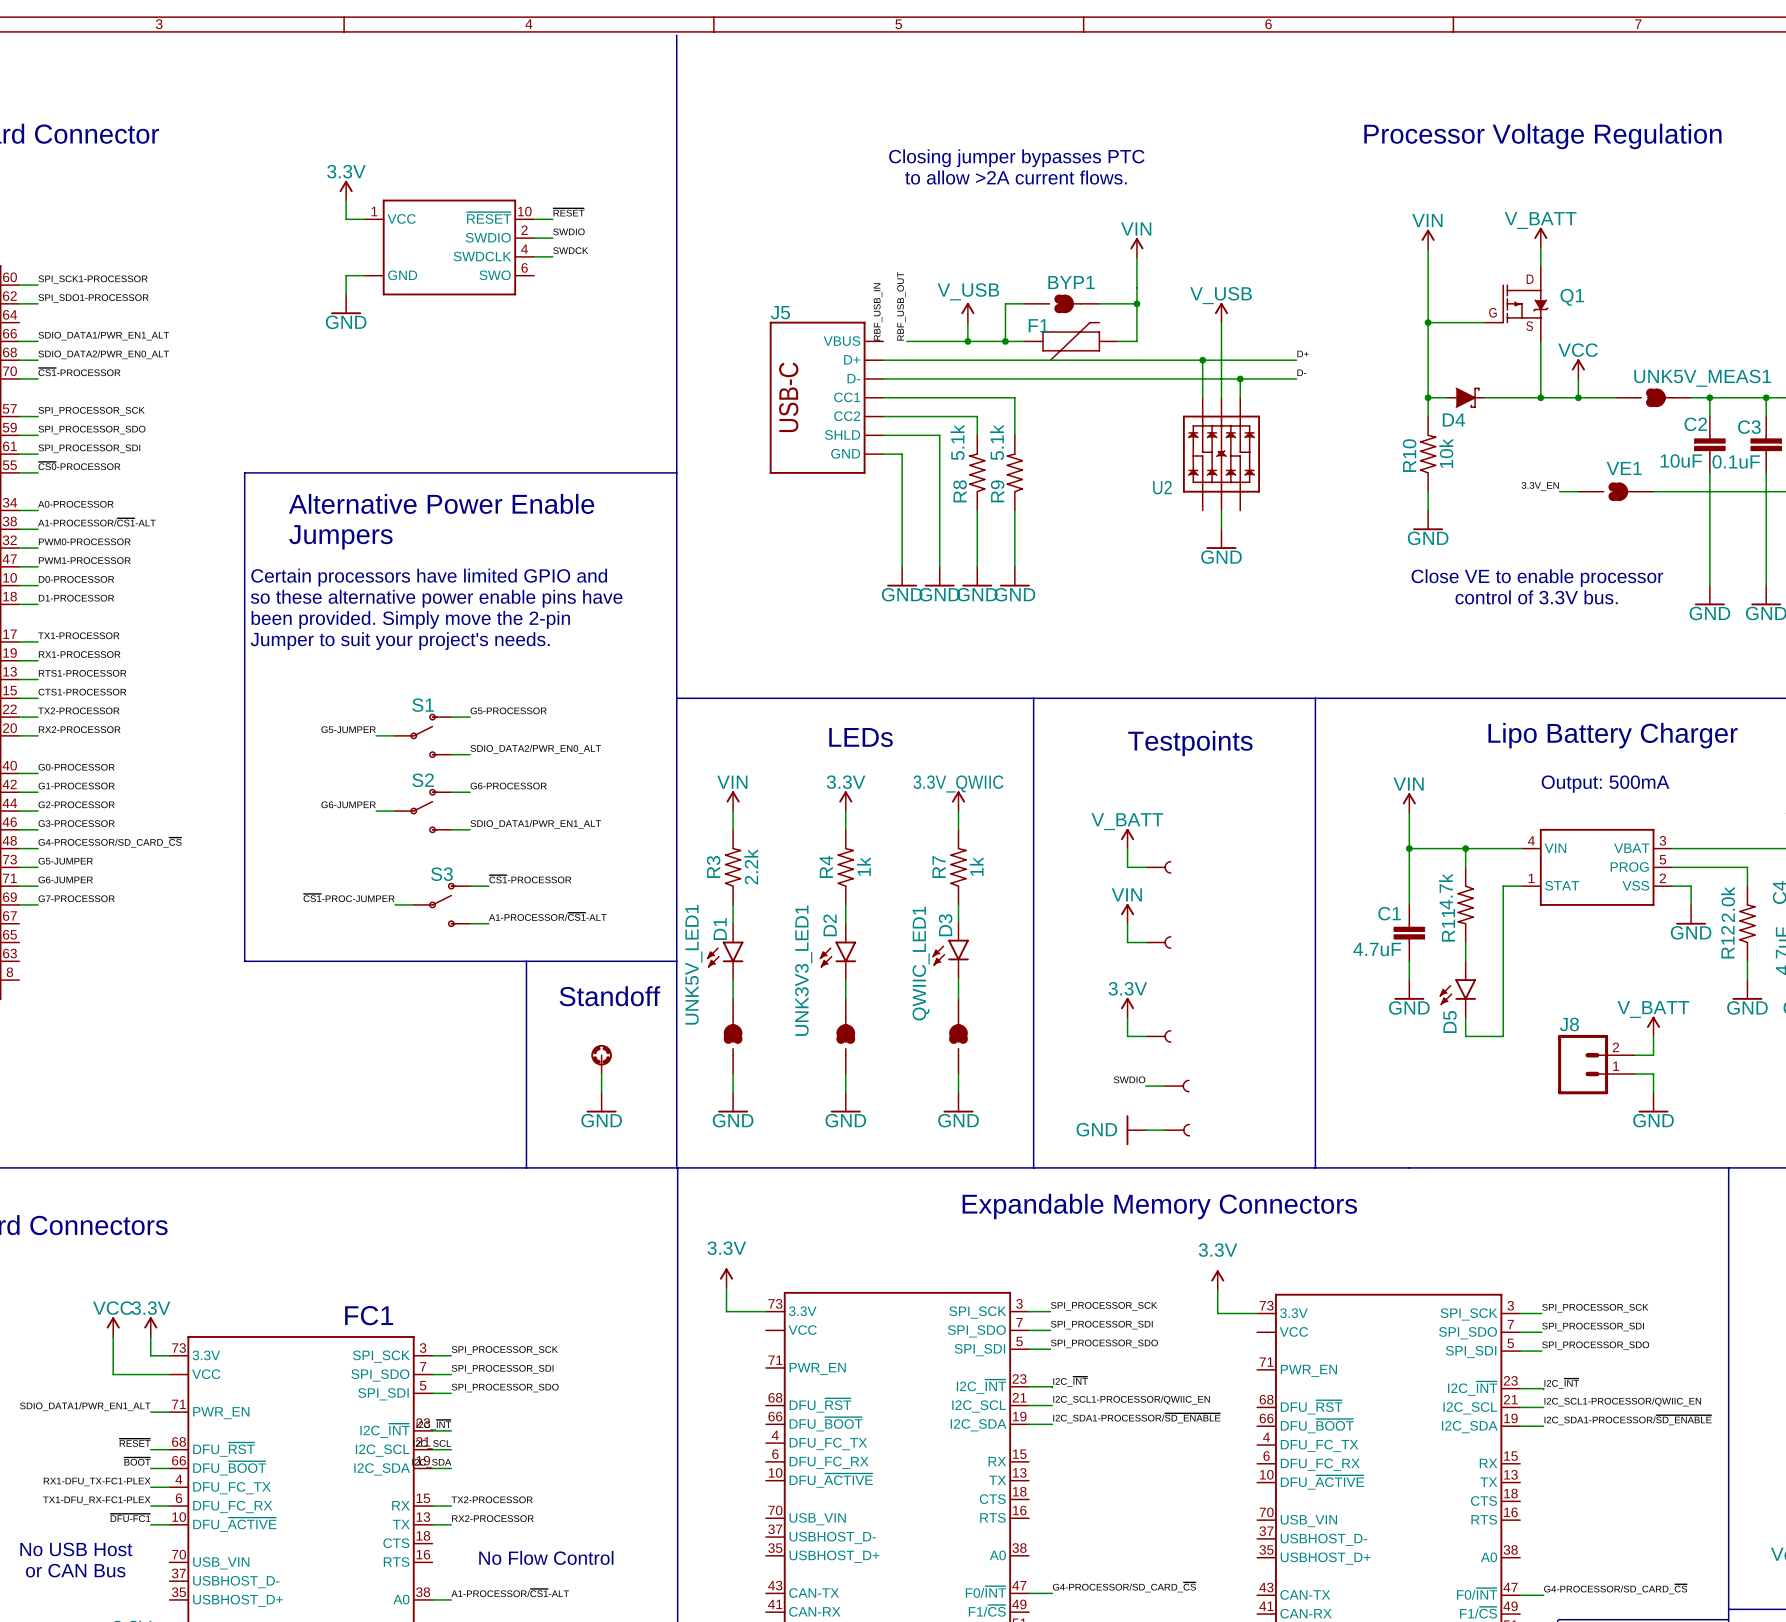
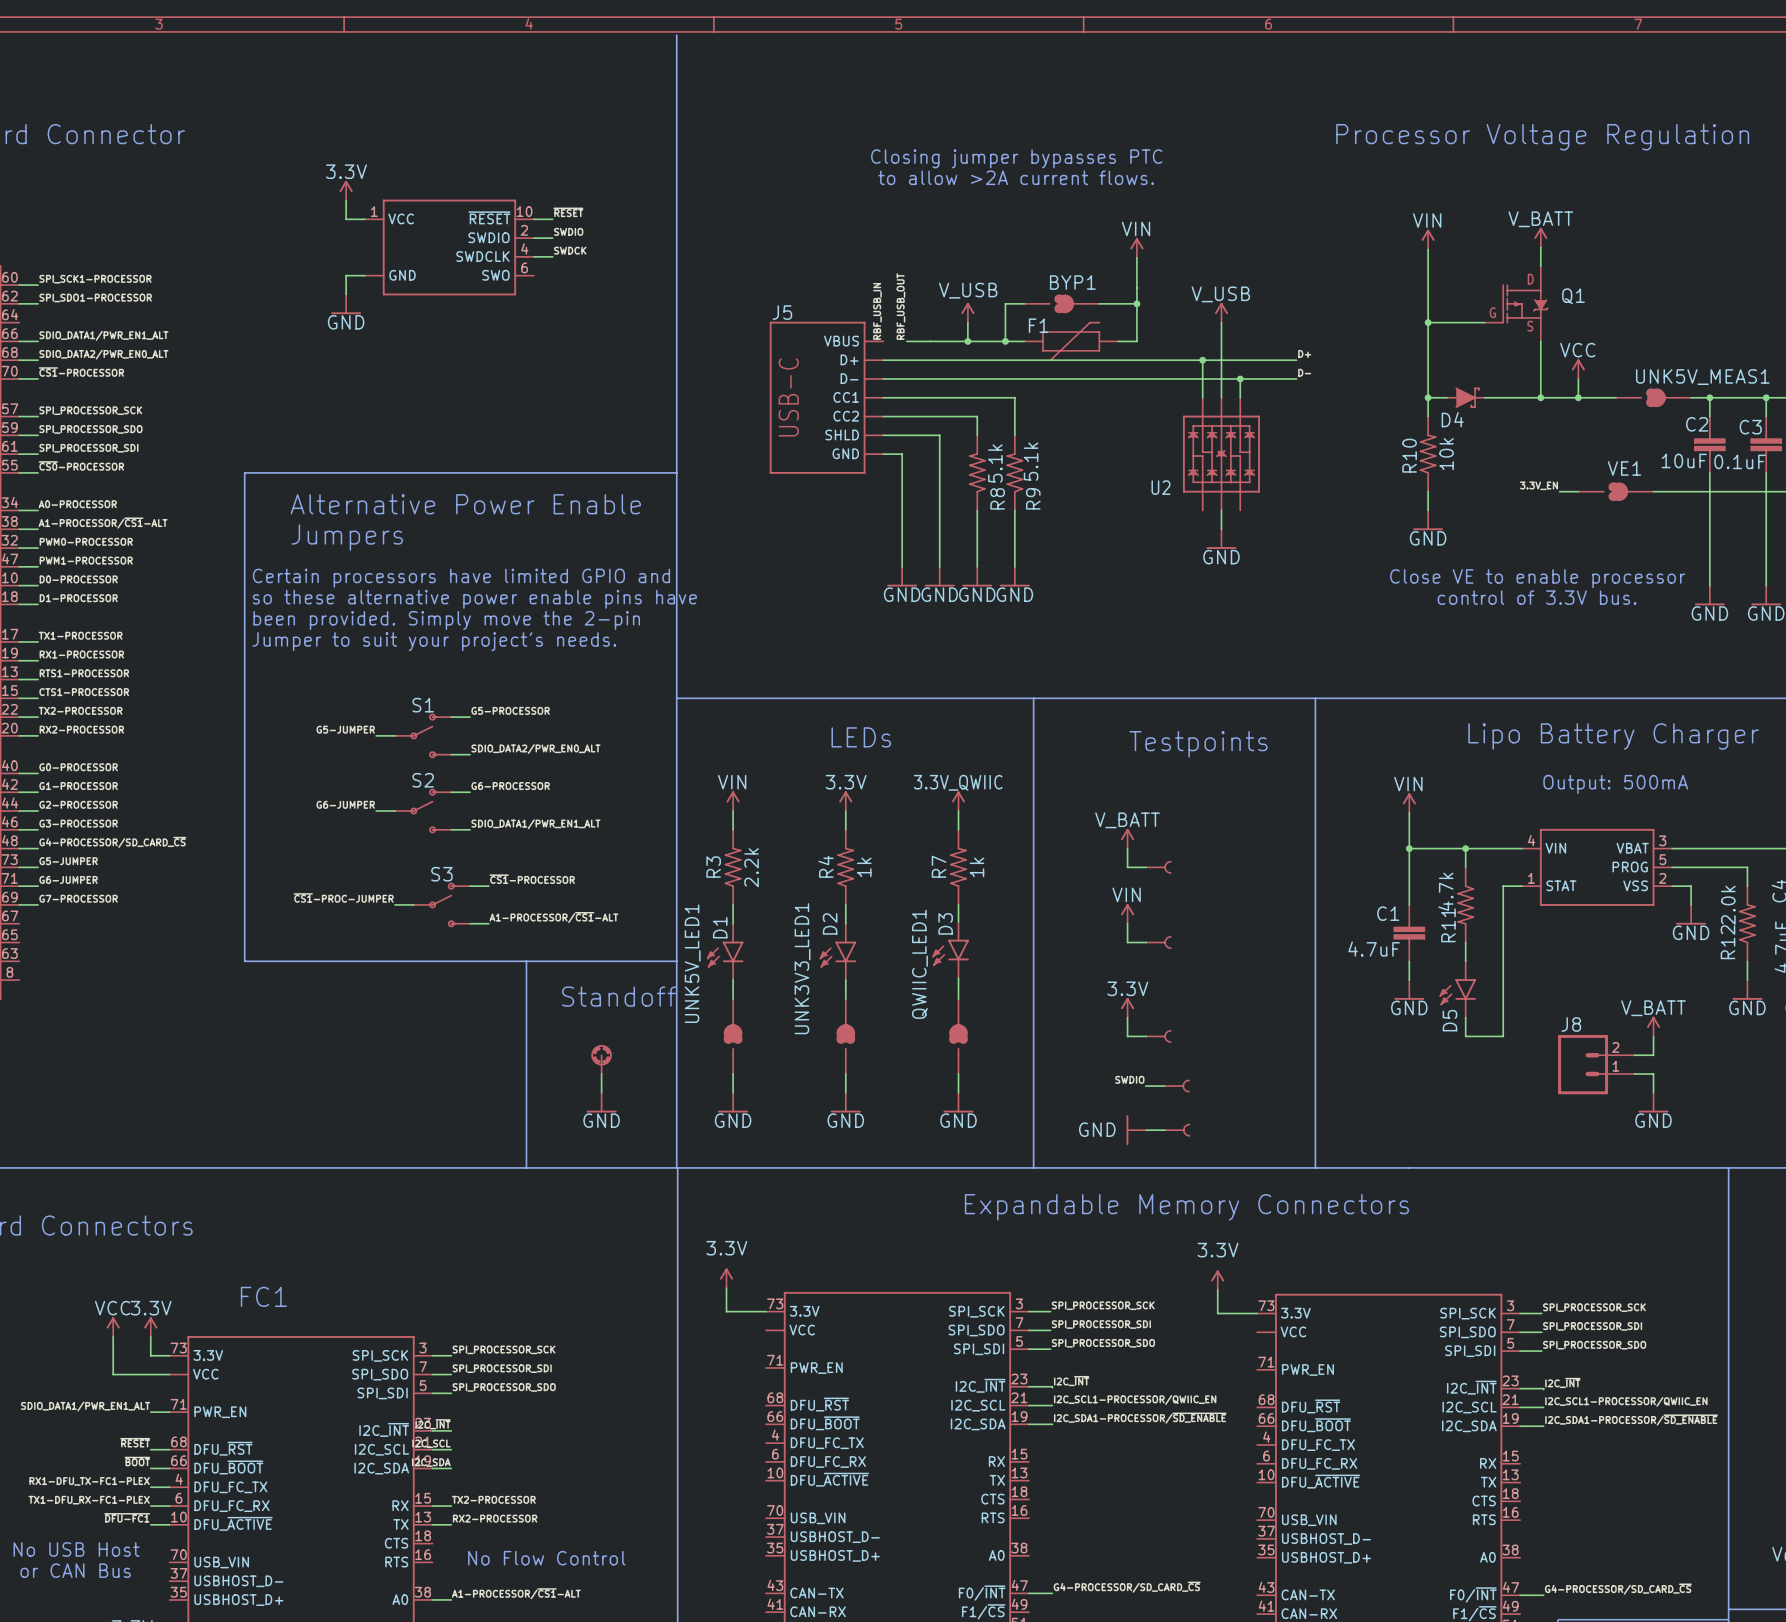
R8 value position: 5.1k (957, 442) -> 5.1k (995, 463)
R9 value position: 5.1k (997, 442) -> 5.1k (1031, 461)
R8 name position: R8 (960, 491) -> R8 (997, 498)
R9 name position: R9 (997, 491) -> R9 (1033, 498)
text position: FC1 (369, 1315) -> FC1 (263, 1296)

